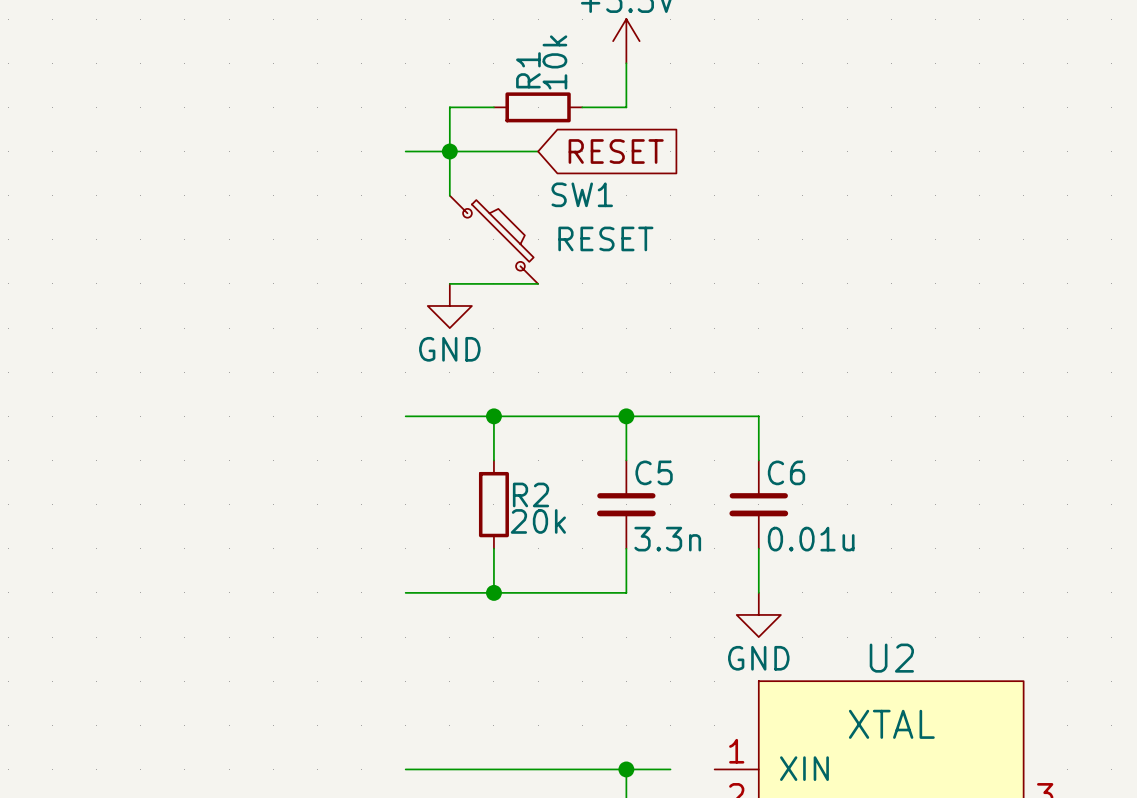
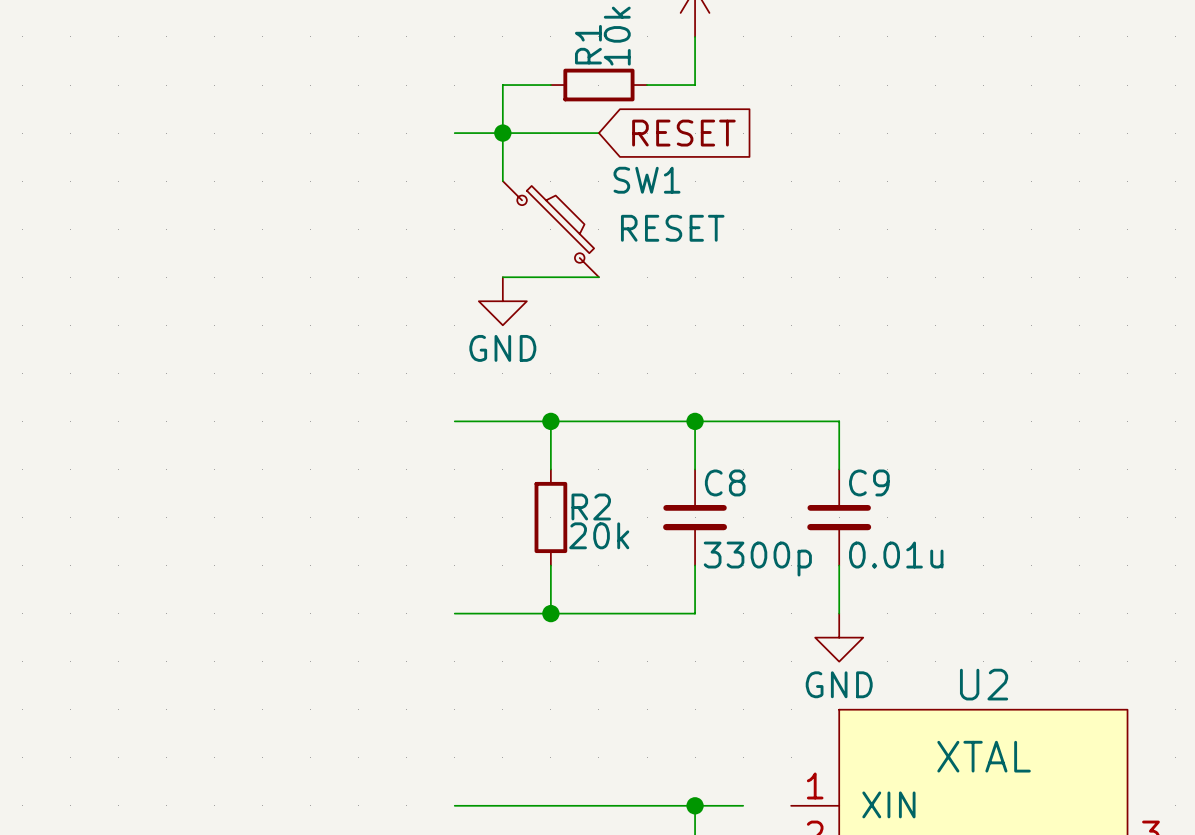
C5 name: C5 (654, 472) -> C8 (725, 482)
C6 name: C6 (786, 472) -> C9 (869, 482)
C5 value: 3.3n (667, 539) -> 3300p (757, 559)

